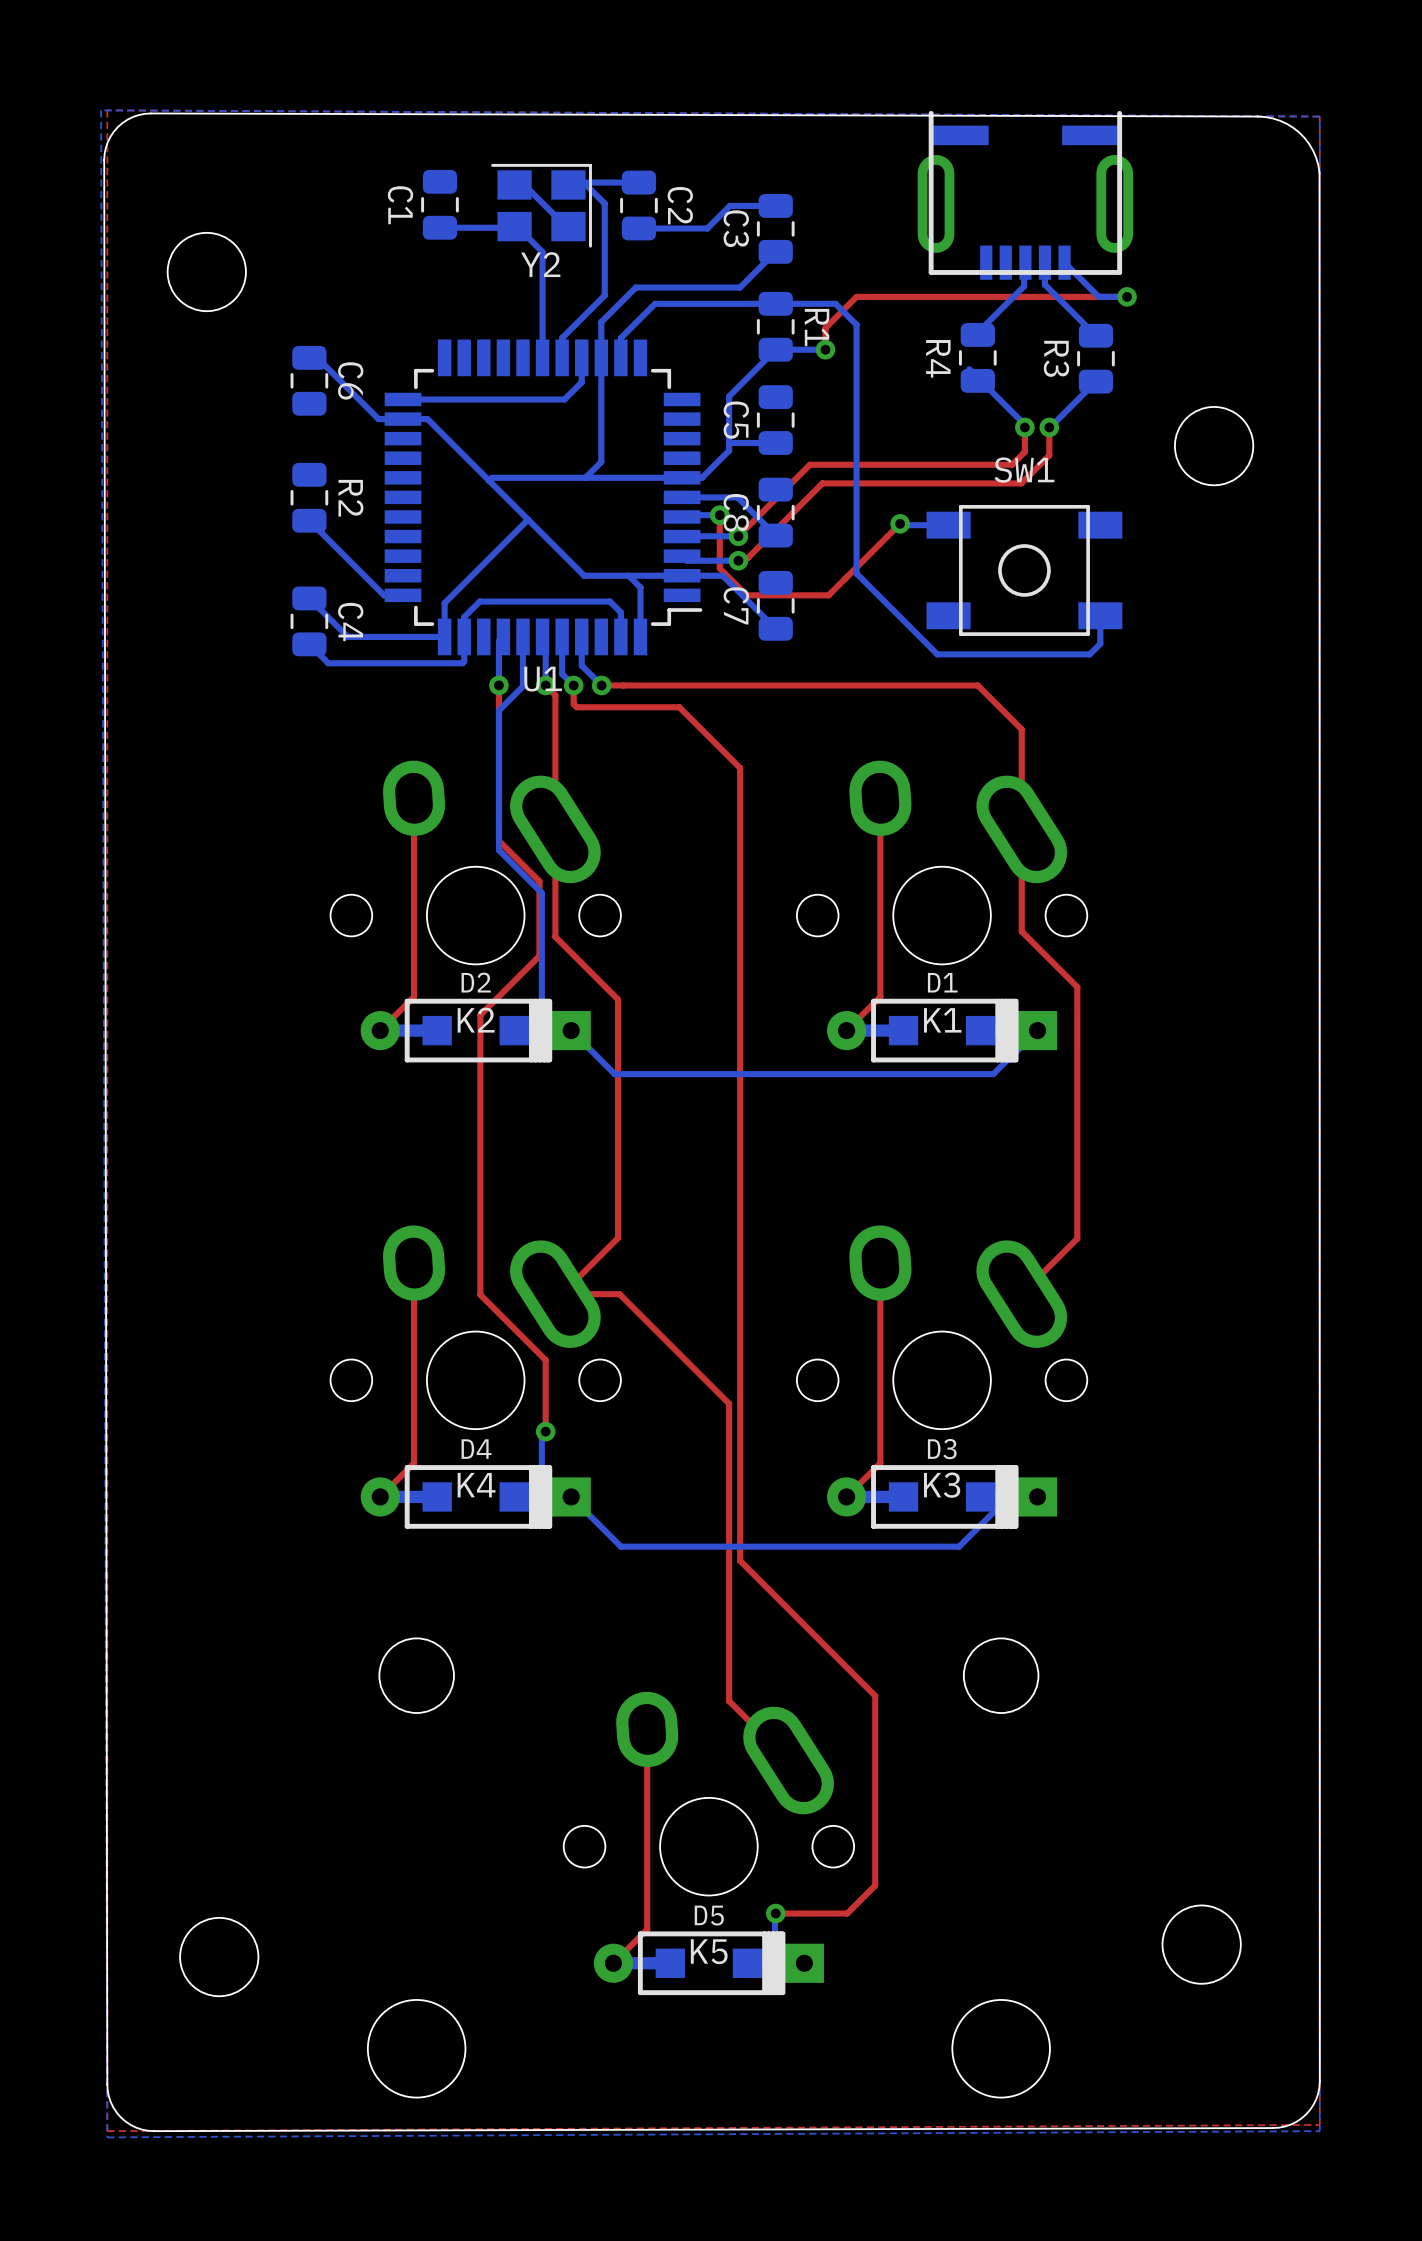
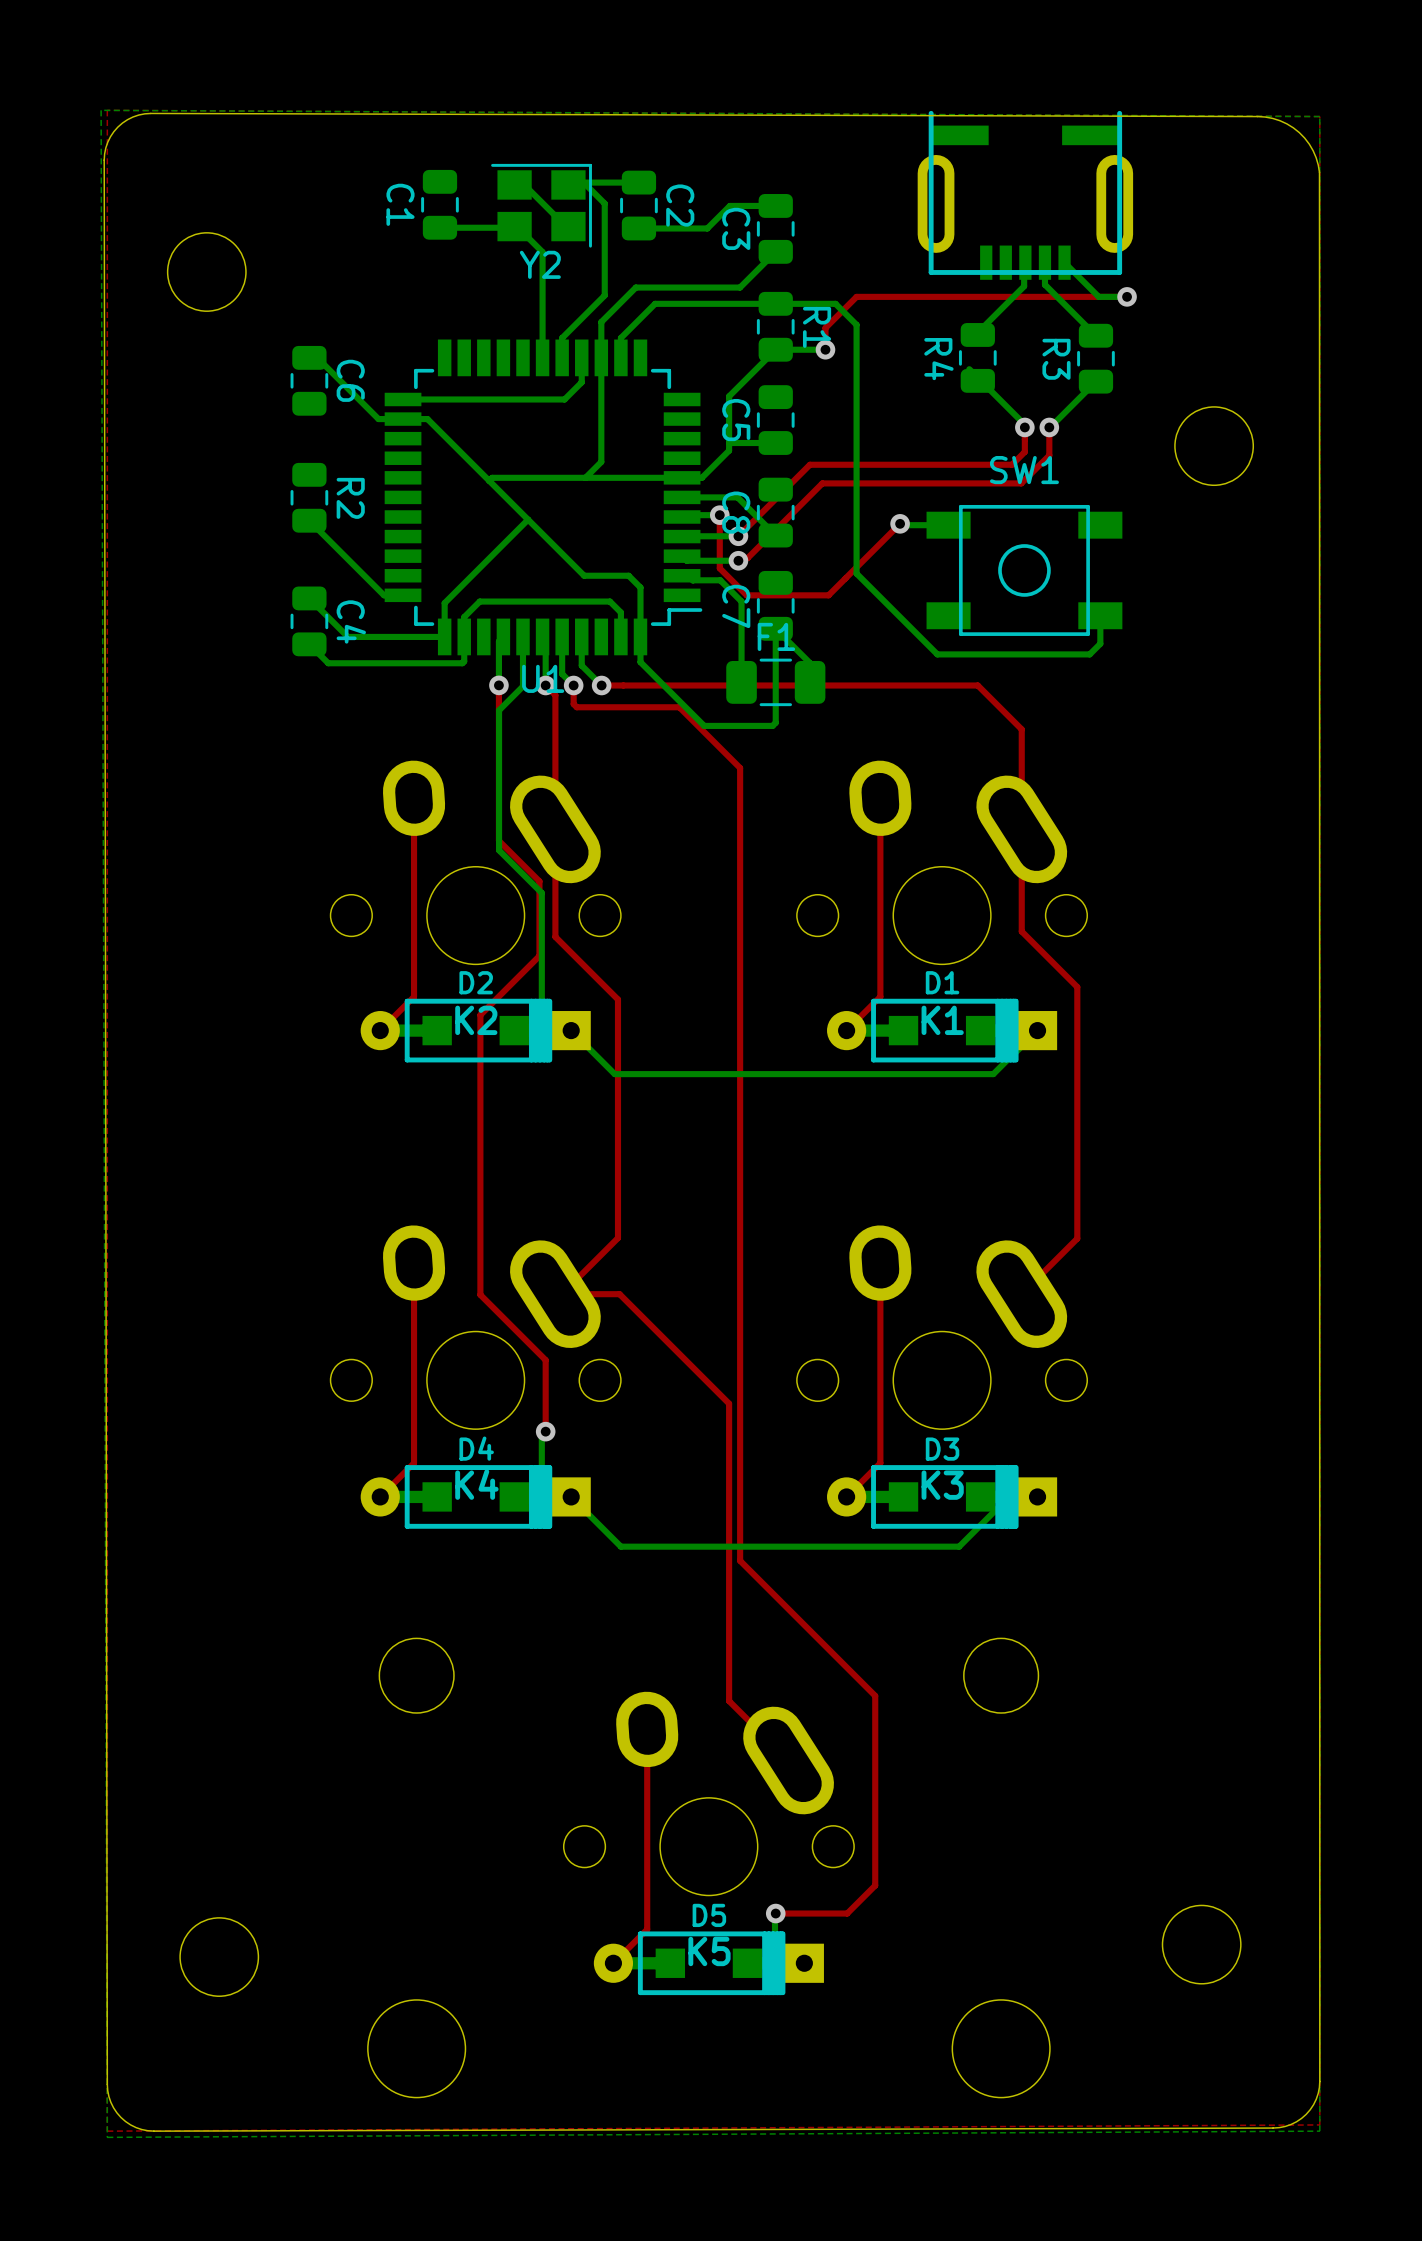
bottom track: (628, 575) (722, 575) (775, 628) -> none
bottom track: none -> (693, 580) (720, 580) (741, 601) (741, 682)
bottom track: none -> (640, 636) (640, 662) (704, 725) (772, 725) (775, 722) (775, 628) (810, 663) (810, 682)
F1: none -> (775, 682)

